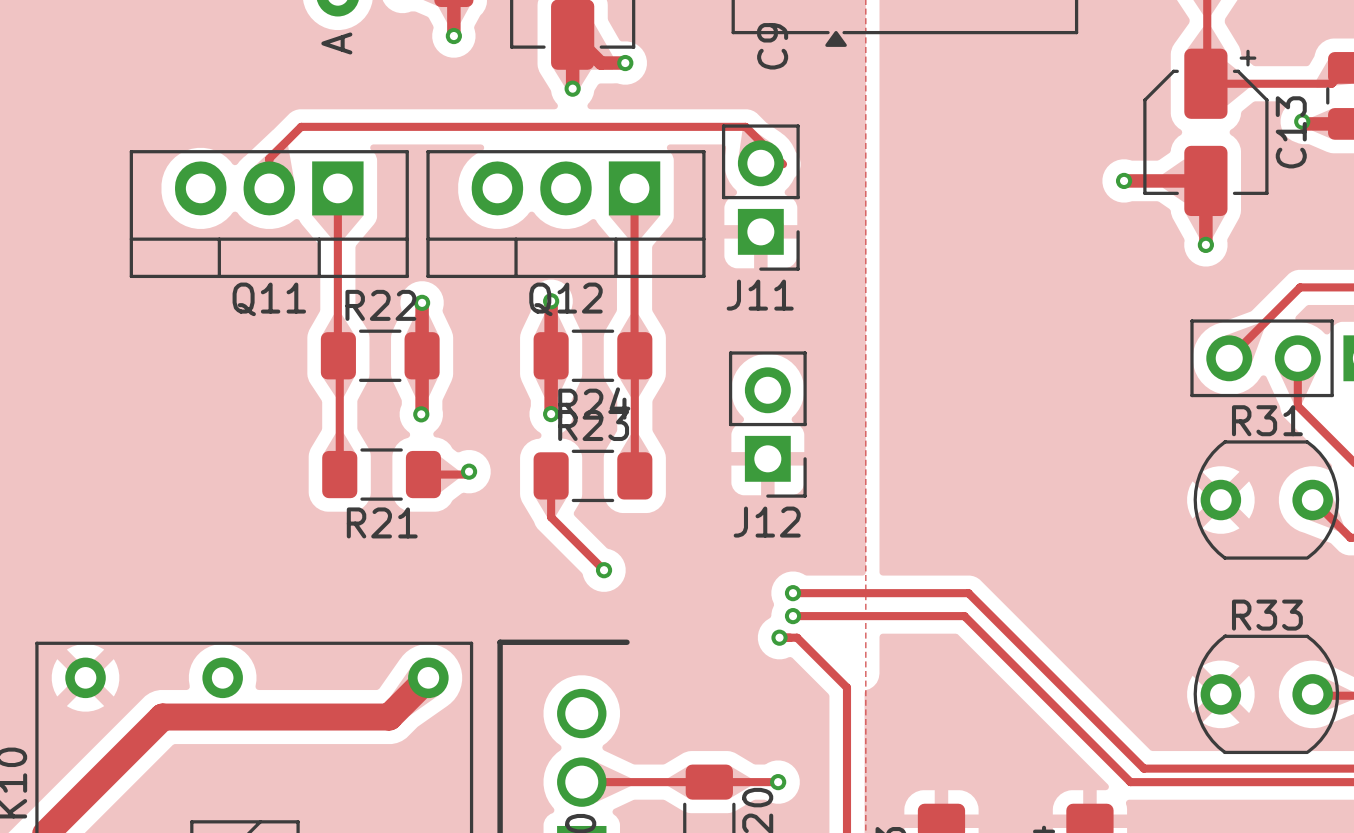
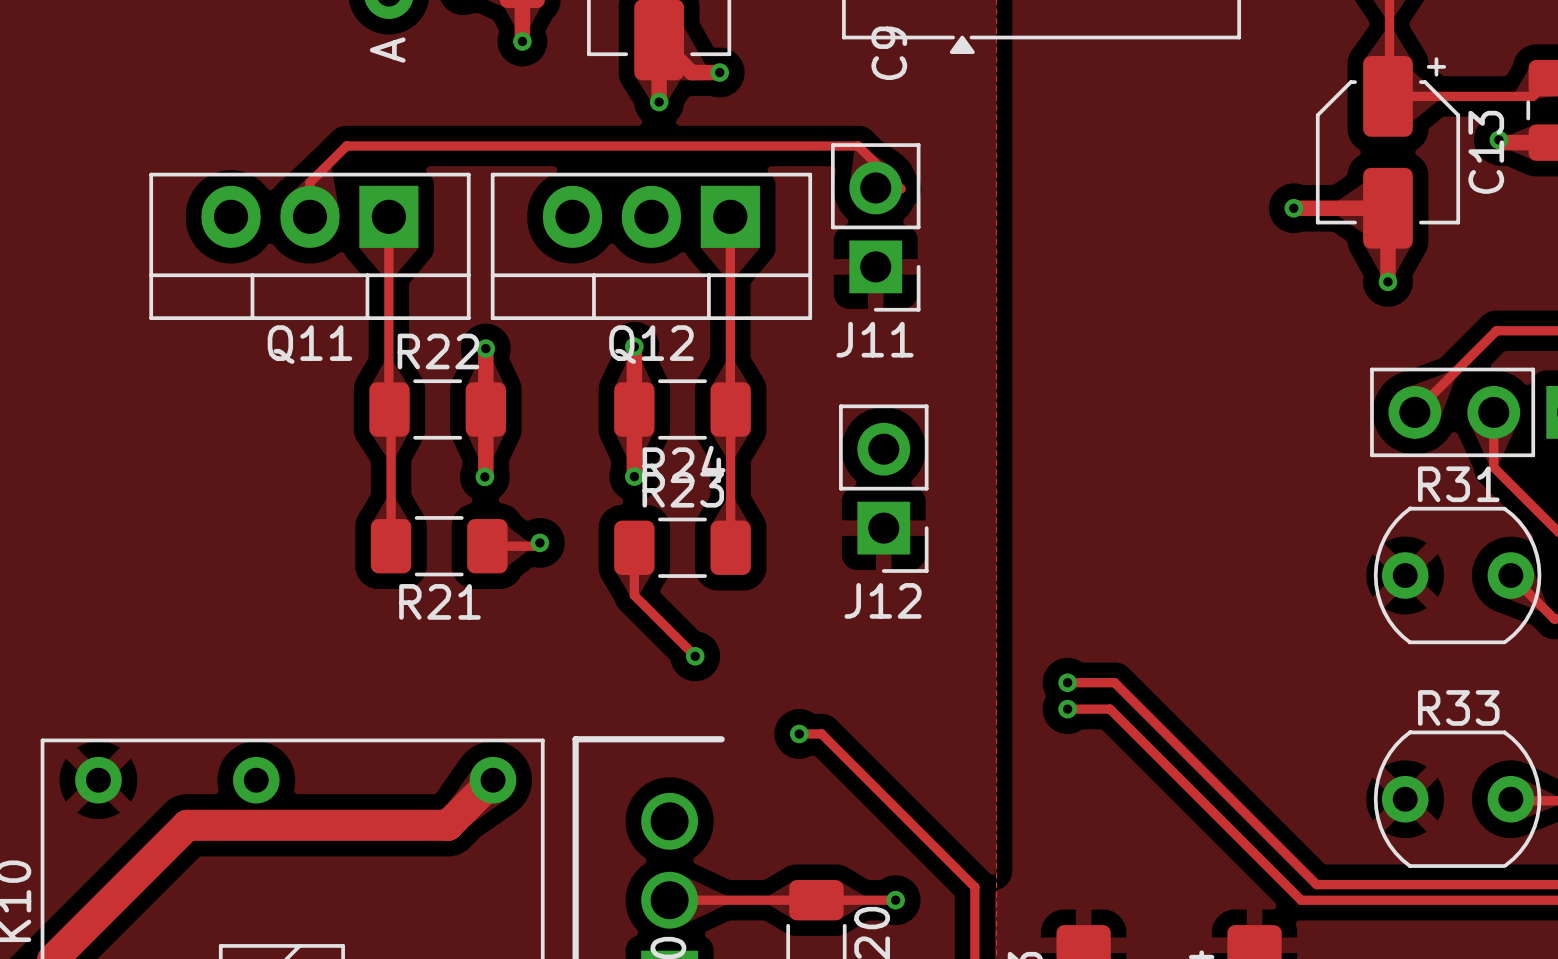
track: (793, 593) (927, 593) -> none
via: (793, 593) -> none
via: none -> (1067, 682)
track: (793, 616) (927, 616) -> none
via: (793, 616) -> none
via: none -> (1067, 709)
via: none -> (799, 733)
track: (779, 637) (797, 637) (846, 687) (846, 770) -> (799, 733) (821, 733) (974, 887)
via: (779, 637) -> none

